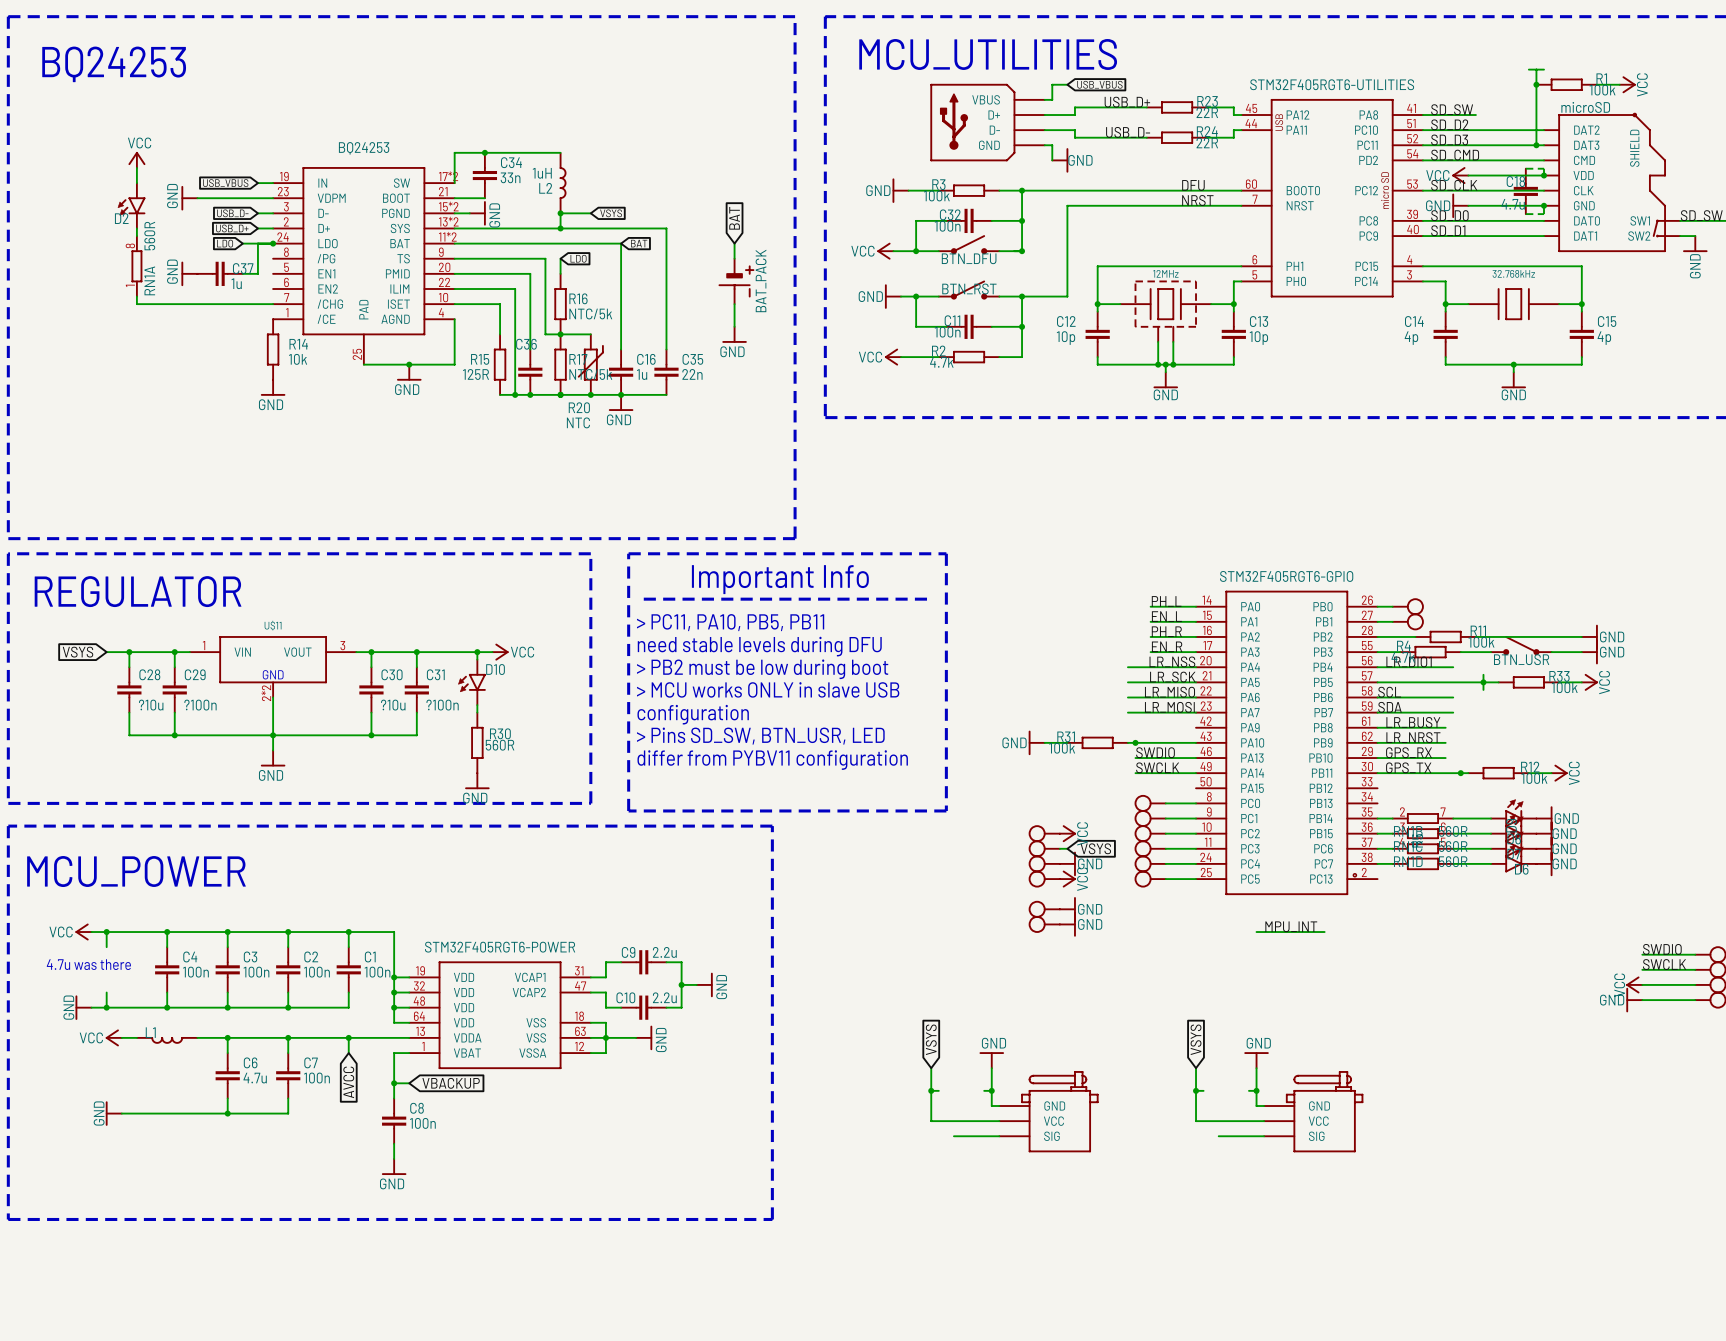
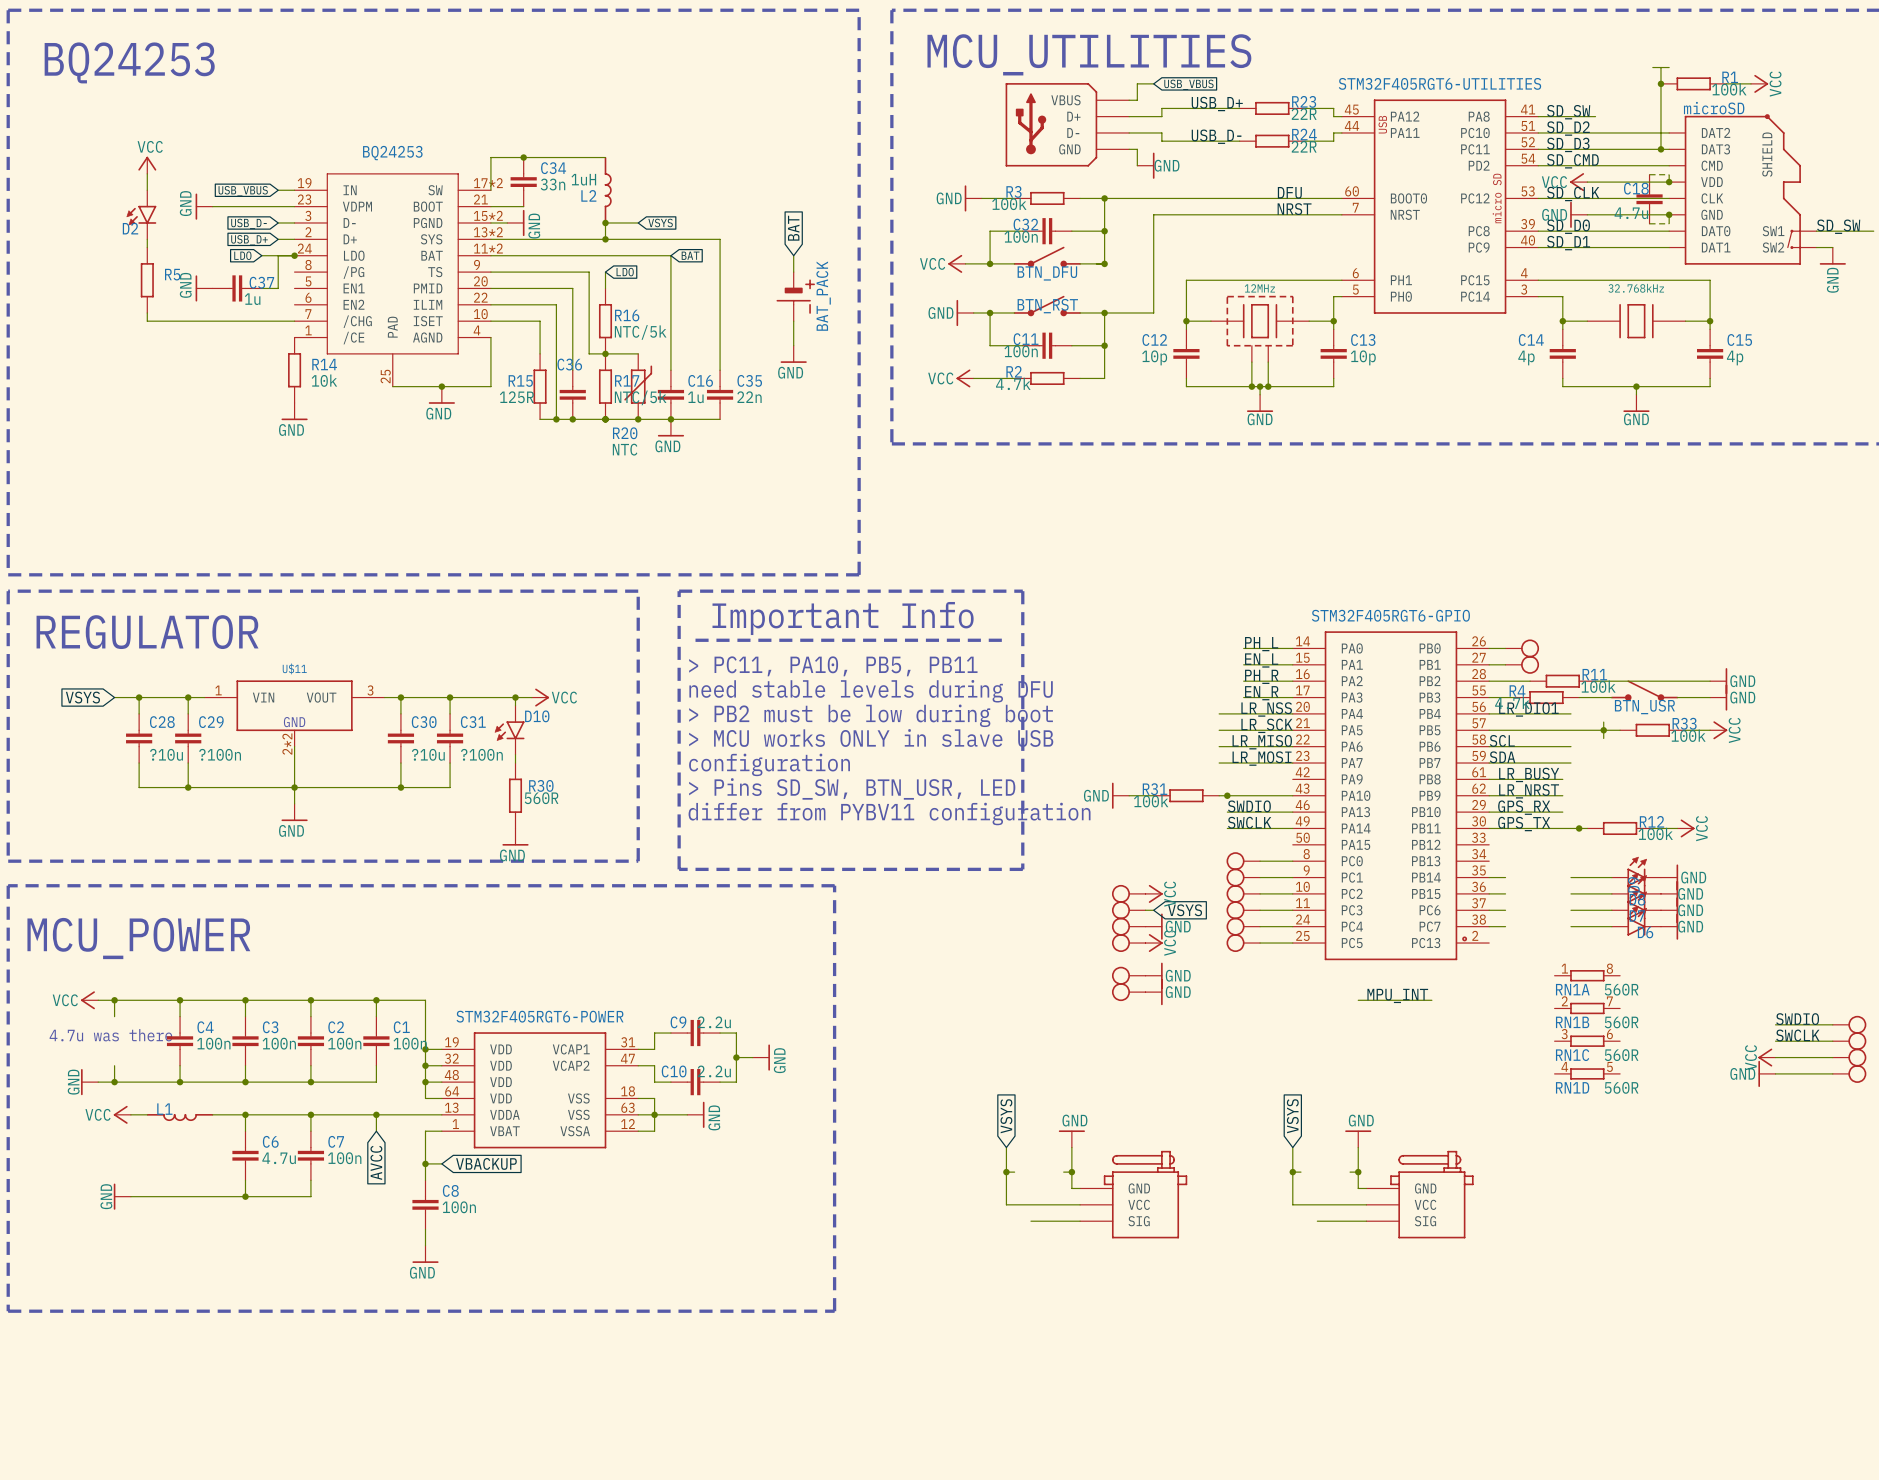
RN1A rotation: 0° (136, 266) -> 90° clockwise (1587, 975)
RN1A position: (136, 266) -> (1587, 975)
RN1B position: (1422, 818) -> (1587, 1008)
RN1C position: (1422, 833) -> (1587, 1041)
RN1D position: (1422, 848) -> (1587, 1073)
R5 rotation: 0° (1422, 863) -> 90° clockwise (147, 280)
R5 position: (1422, 863) -> (147, 280)

